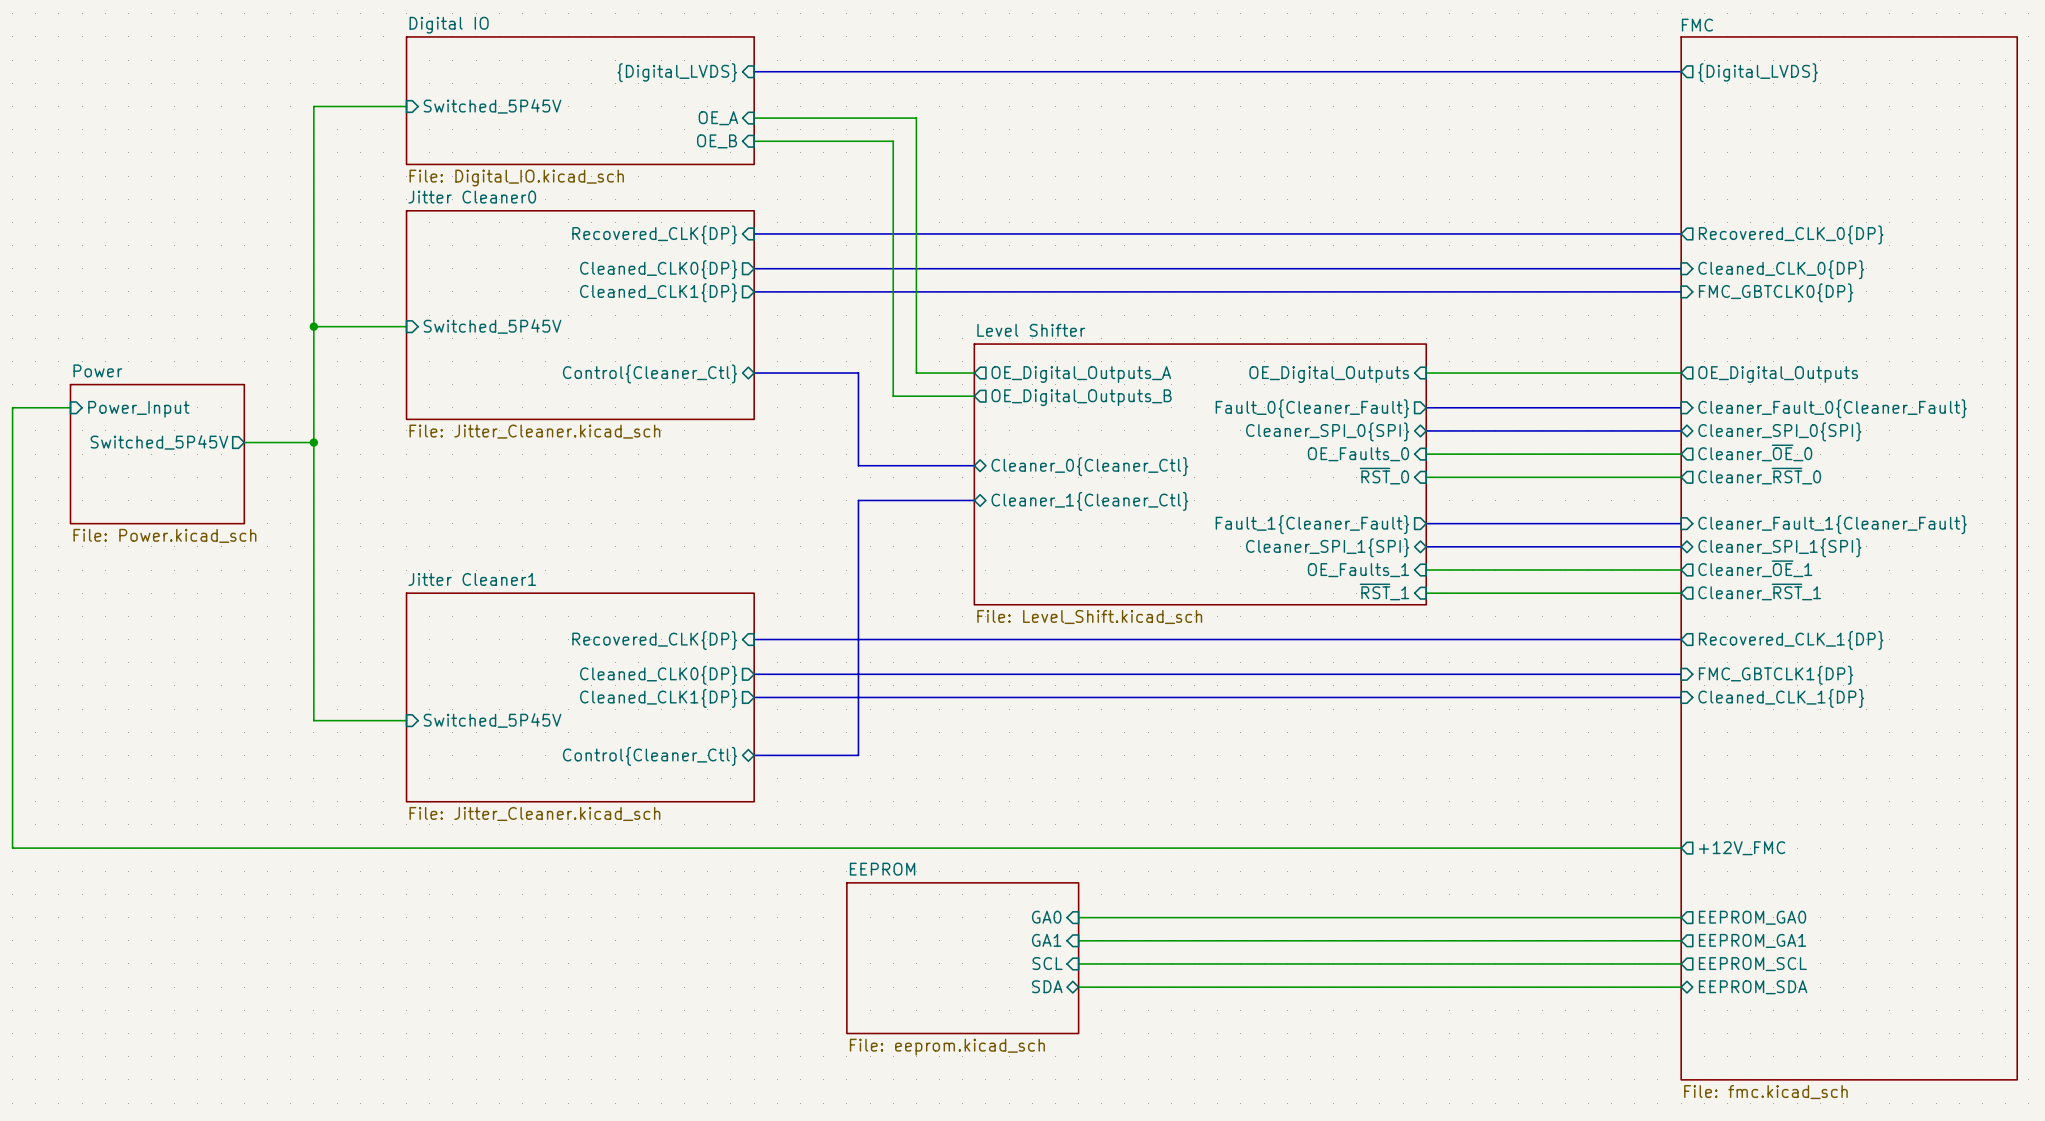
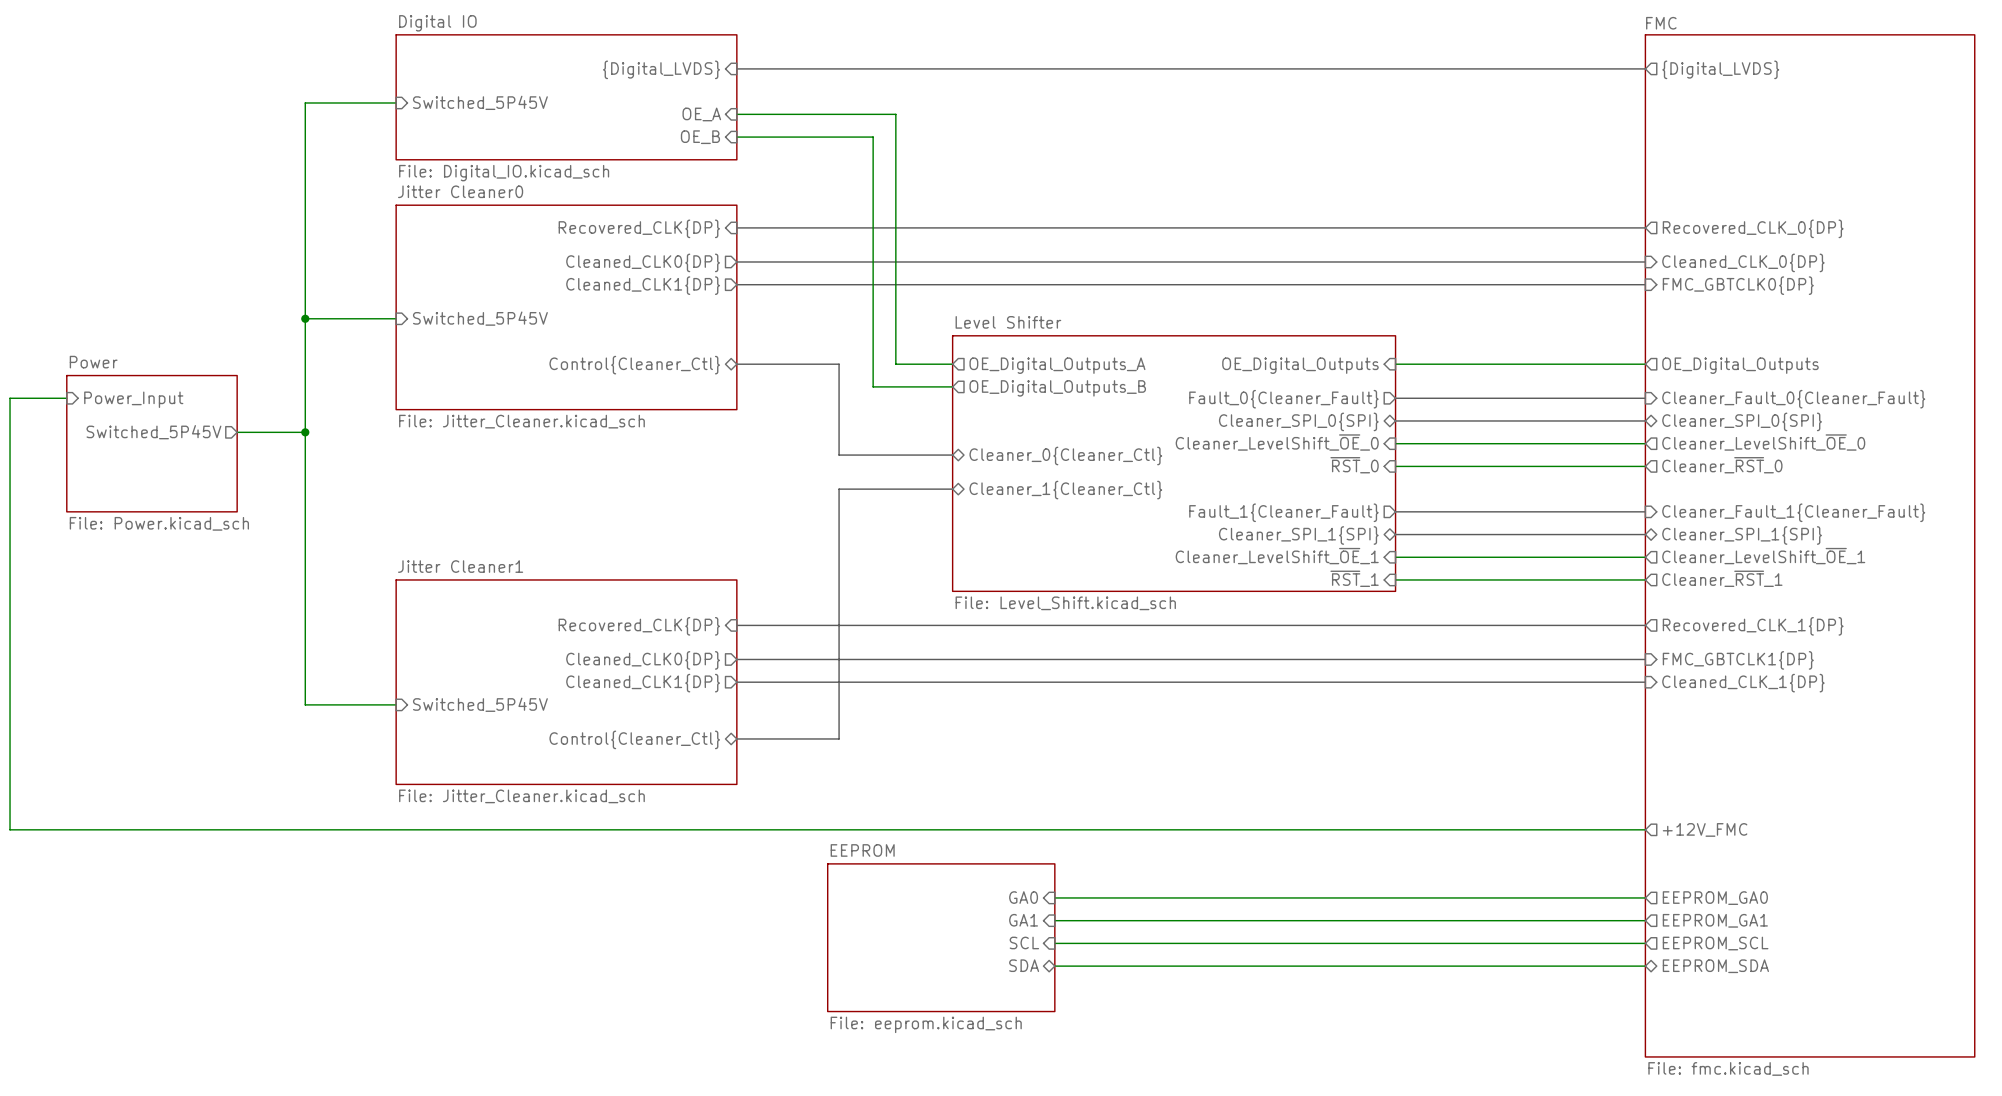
sheet pin: Cleaner_~{OE}_0 (1755, 452) -> Cleaner_LevelShift_~{OE}_0 (1763, 442)
sheet pin: OE_Faults_0 (1358, 454) -> Cleaner_LevelShift_~{OE}_0 (1277, 442)
sheet pin: Cleaner_~{OE}_1 (1755, 568) -> Cleaner_LevelShift_~{OE}_1 (1763, 556)
sheet pin: OE_Faults_1 (1358, 570) -> Cleaner_LevelShift_~{OE}_1 (1277, 556)

